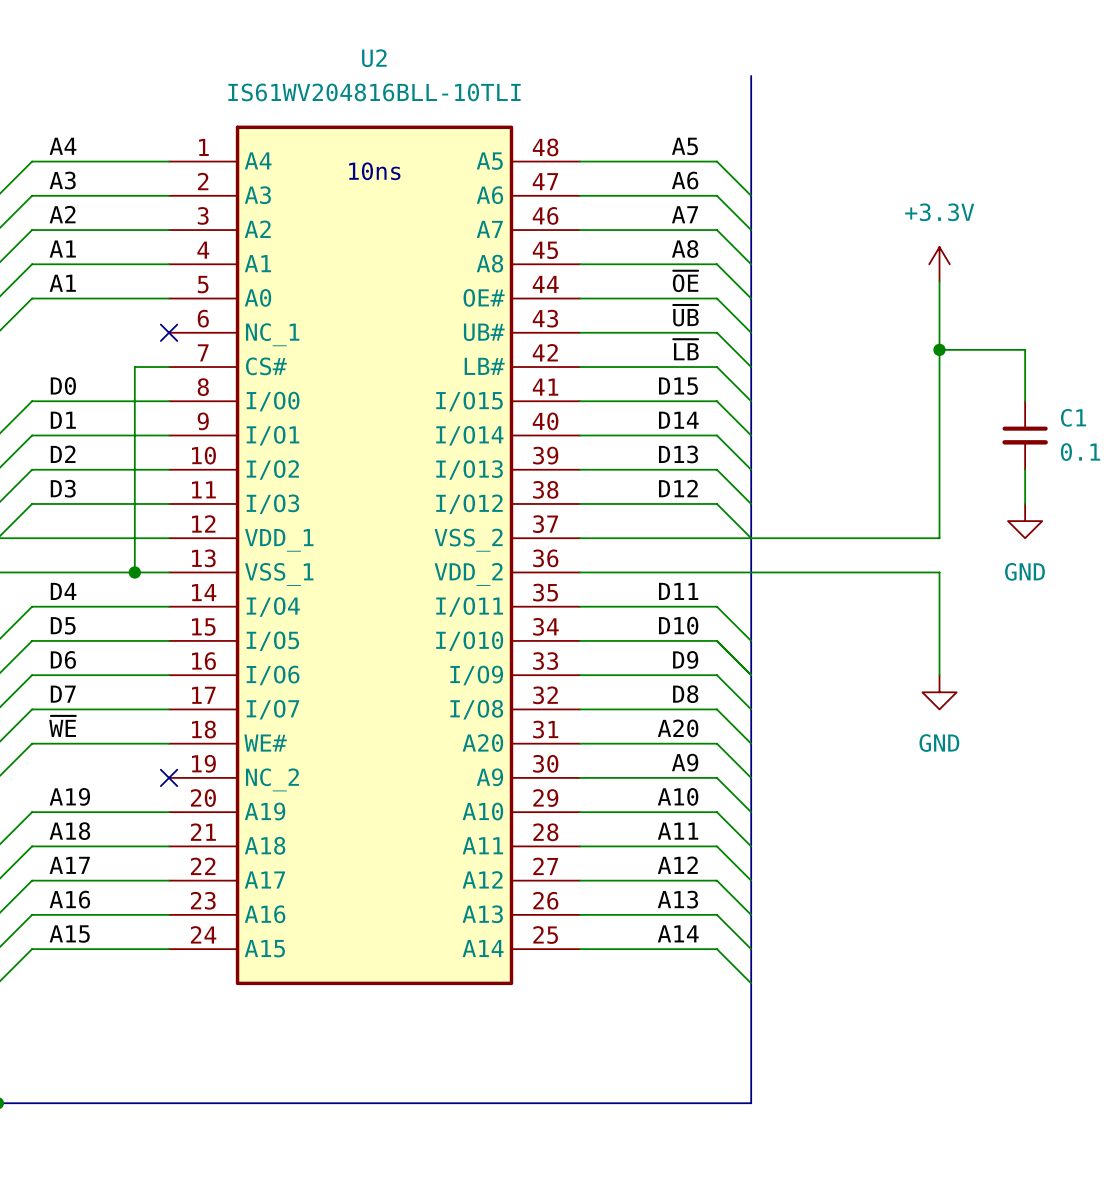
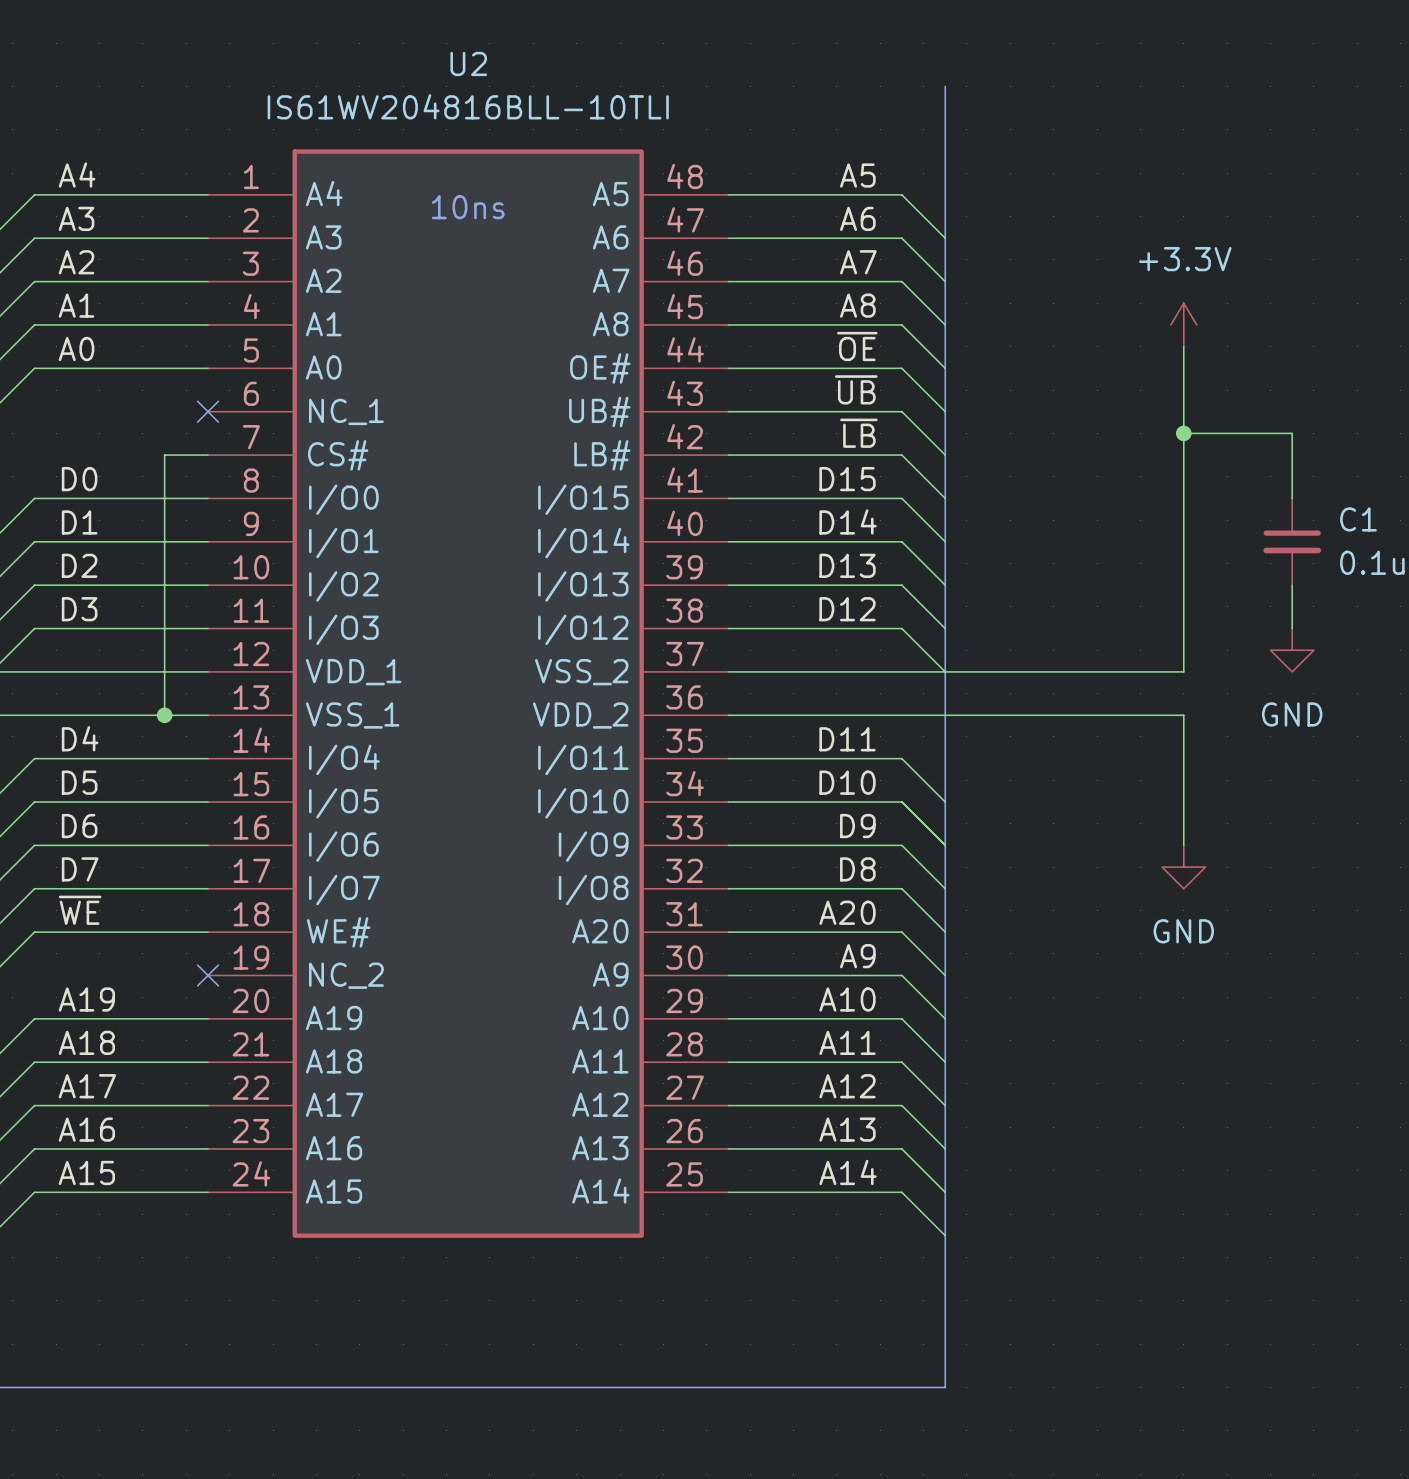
label: A1 (62, 283) -> A0 (76, 348)

